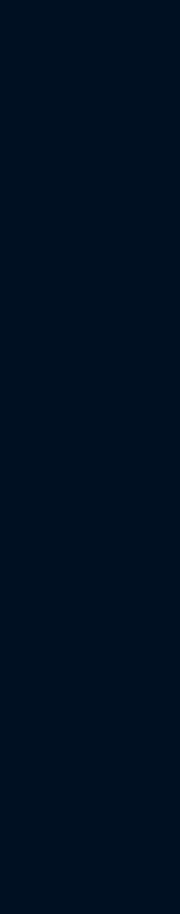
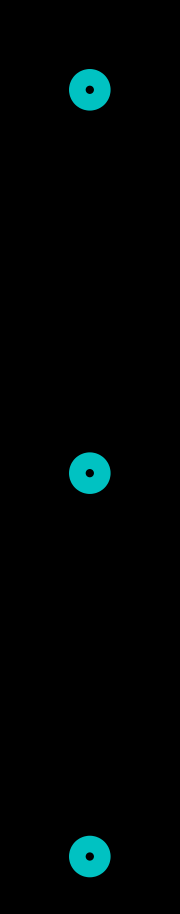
part: none -> (89, 89)
part: none -> (89, 473)
part: none -> (89, 856)

